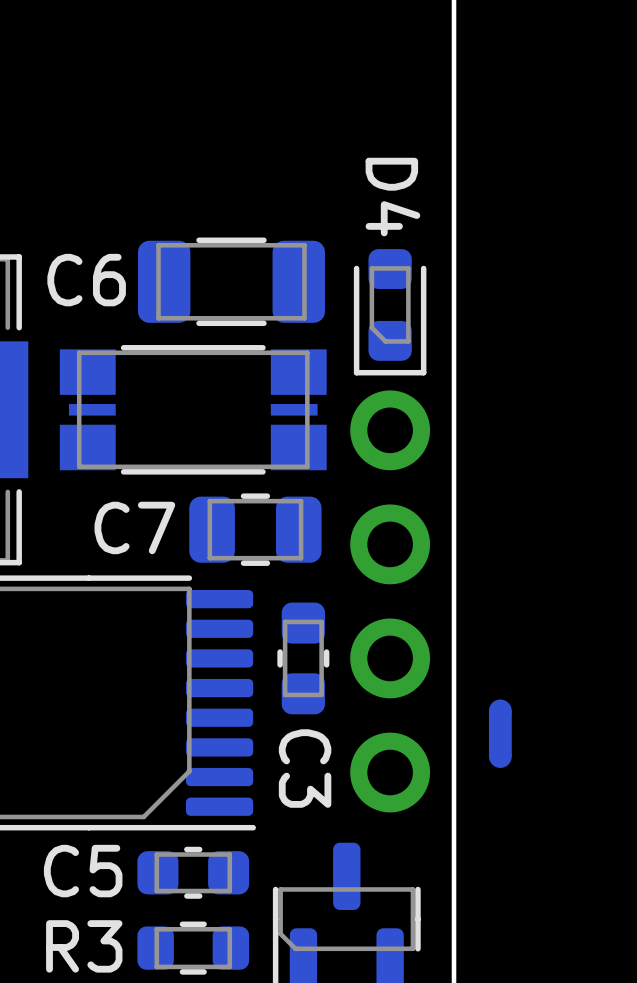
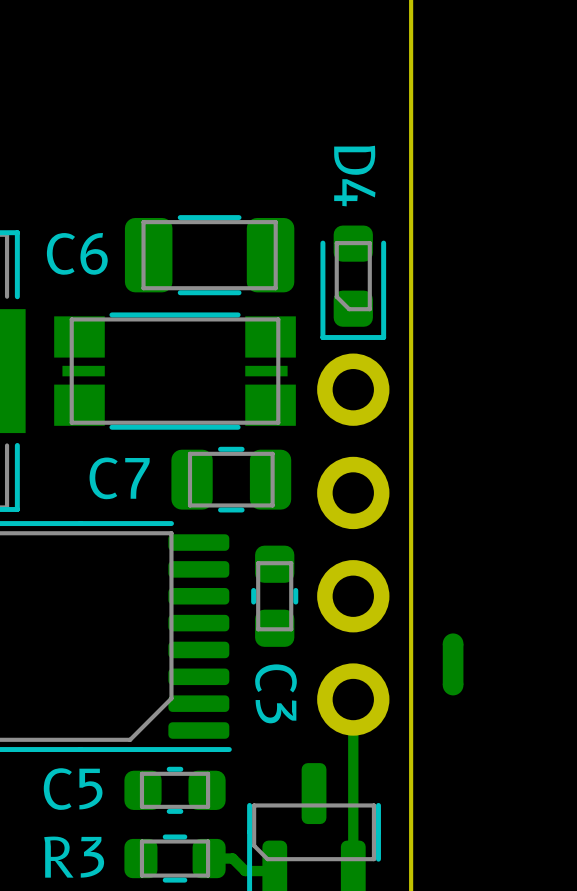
track: none -> (353, 699) (353, 871)
track: none -> (209, 858) (232, 858) (245, 871) (274, 871)

